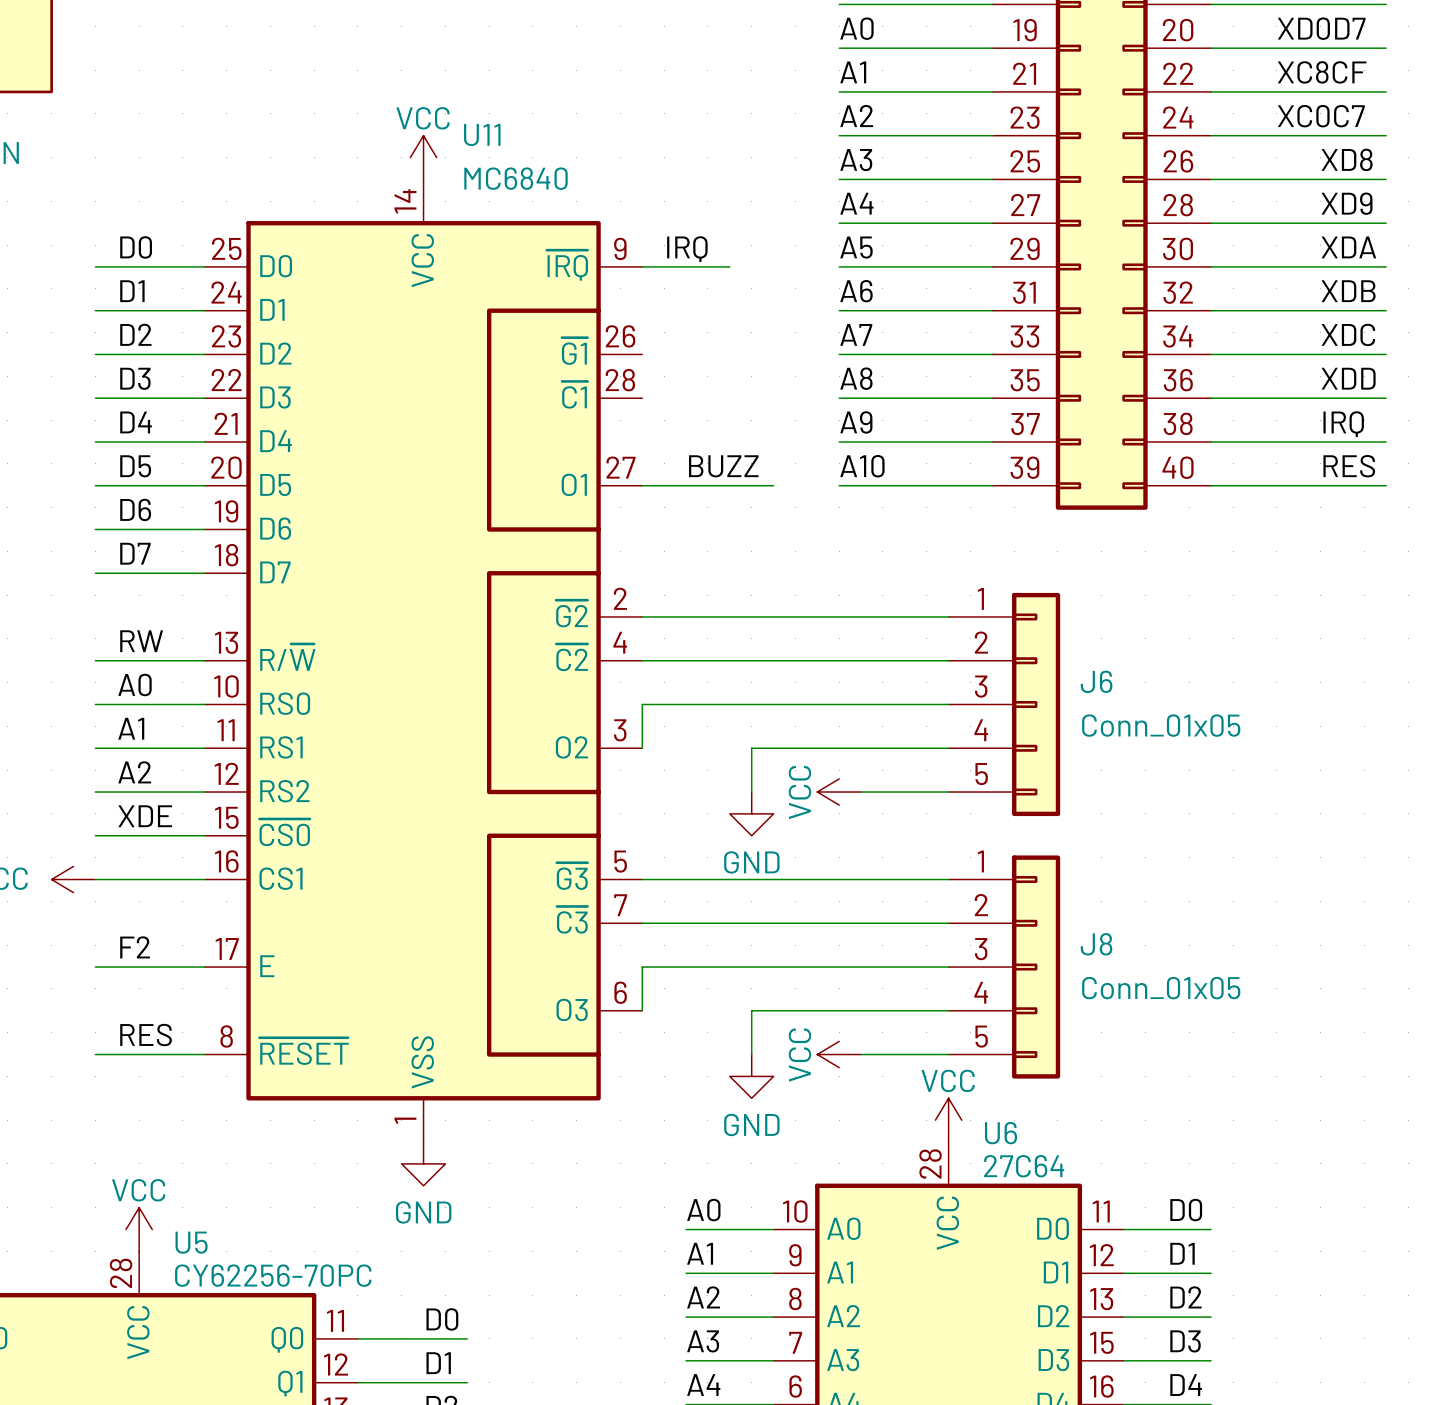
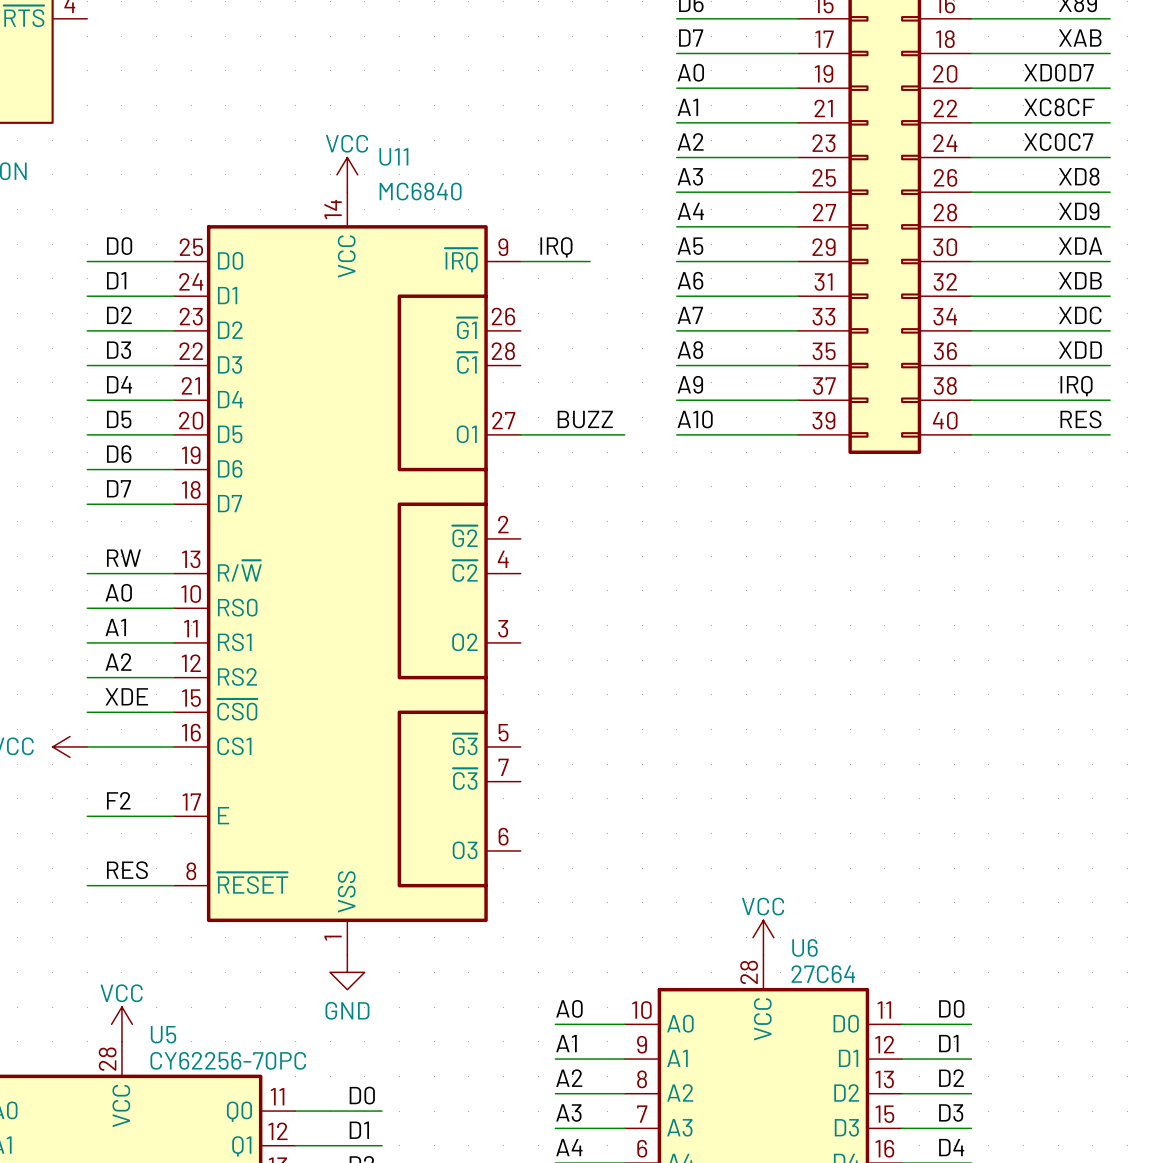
wire: (642, 616) (948, 616) -> none
wire: (642, 660) (948, 660) -> none
wire: (948, 704) (642, 704) (642, 748) -> none
J6: Conn_01x05 (1004, 704) -> none
wire: (948, 748) (751, 748) (751, 792) -> none
power symbol: VCC (839, 792) -> none
wire: (861, 792) (948, 792) -> none
power symbol: GND (751, 813) -> none
wire: (642, 879) (948, 879) -> none
wire: (642, 923) (948, 923) -> none
wire: (948, 967) (642, 967) (642, 1010) -> none
J8: Conn_01x05 (1004, 967) -> none
wire: (948, 1010) (751, 1010) (751, 1054) -> none
power symbol: VCC (839, 1054) -> none
wire: (861, 1054) (948, 1054) -> none
power symbol: GND (751, 1076) -> none

